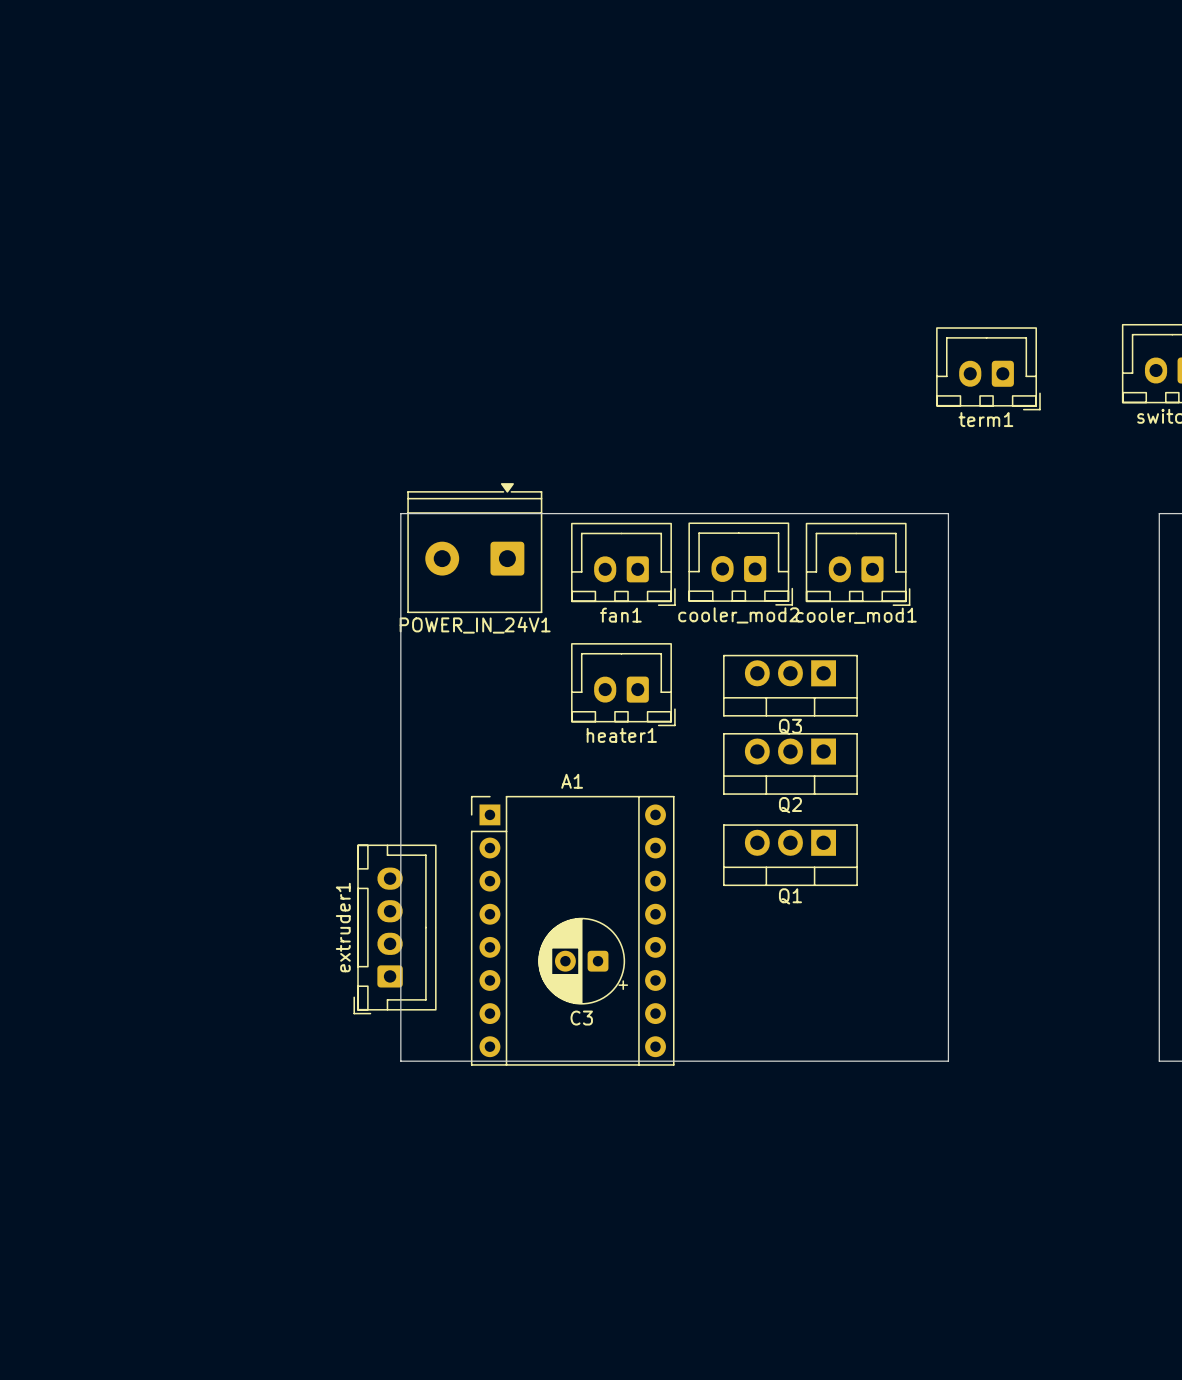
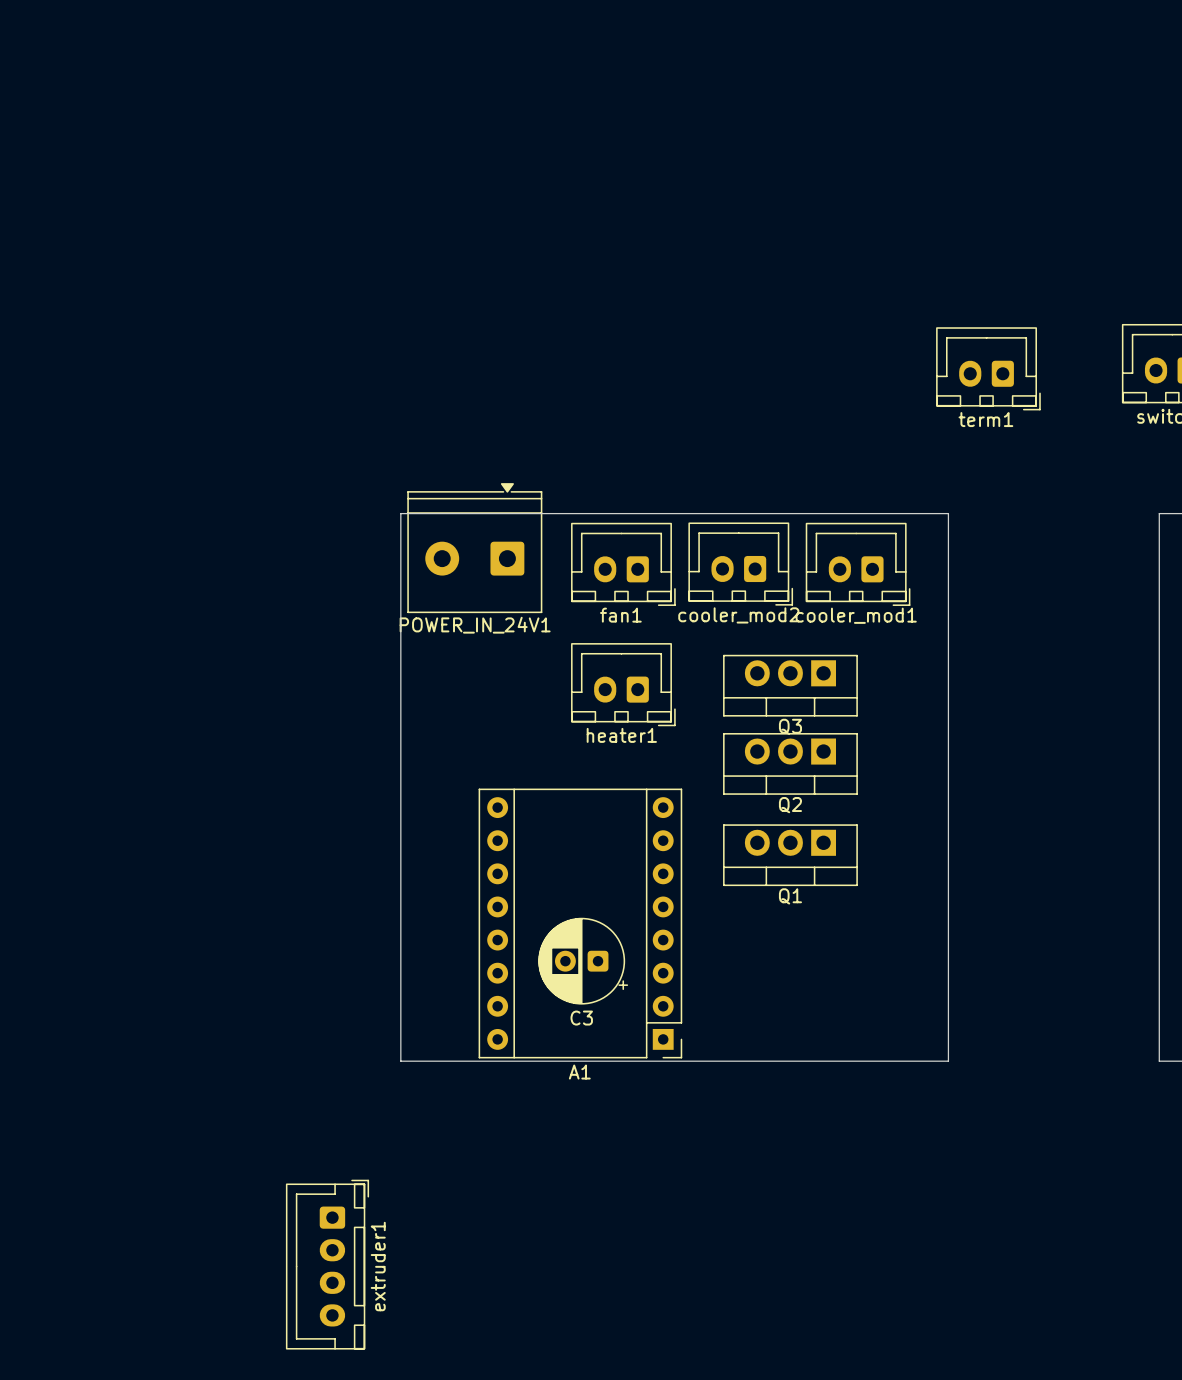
extruder1 rotation: 0° (395, 929) -> 180° (327, 1264)
extruder1 position: (395, 929) -> (327, 1264)
A1 rotation: 0° (572, 930) -> 180° (580, 923)

